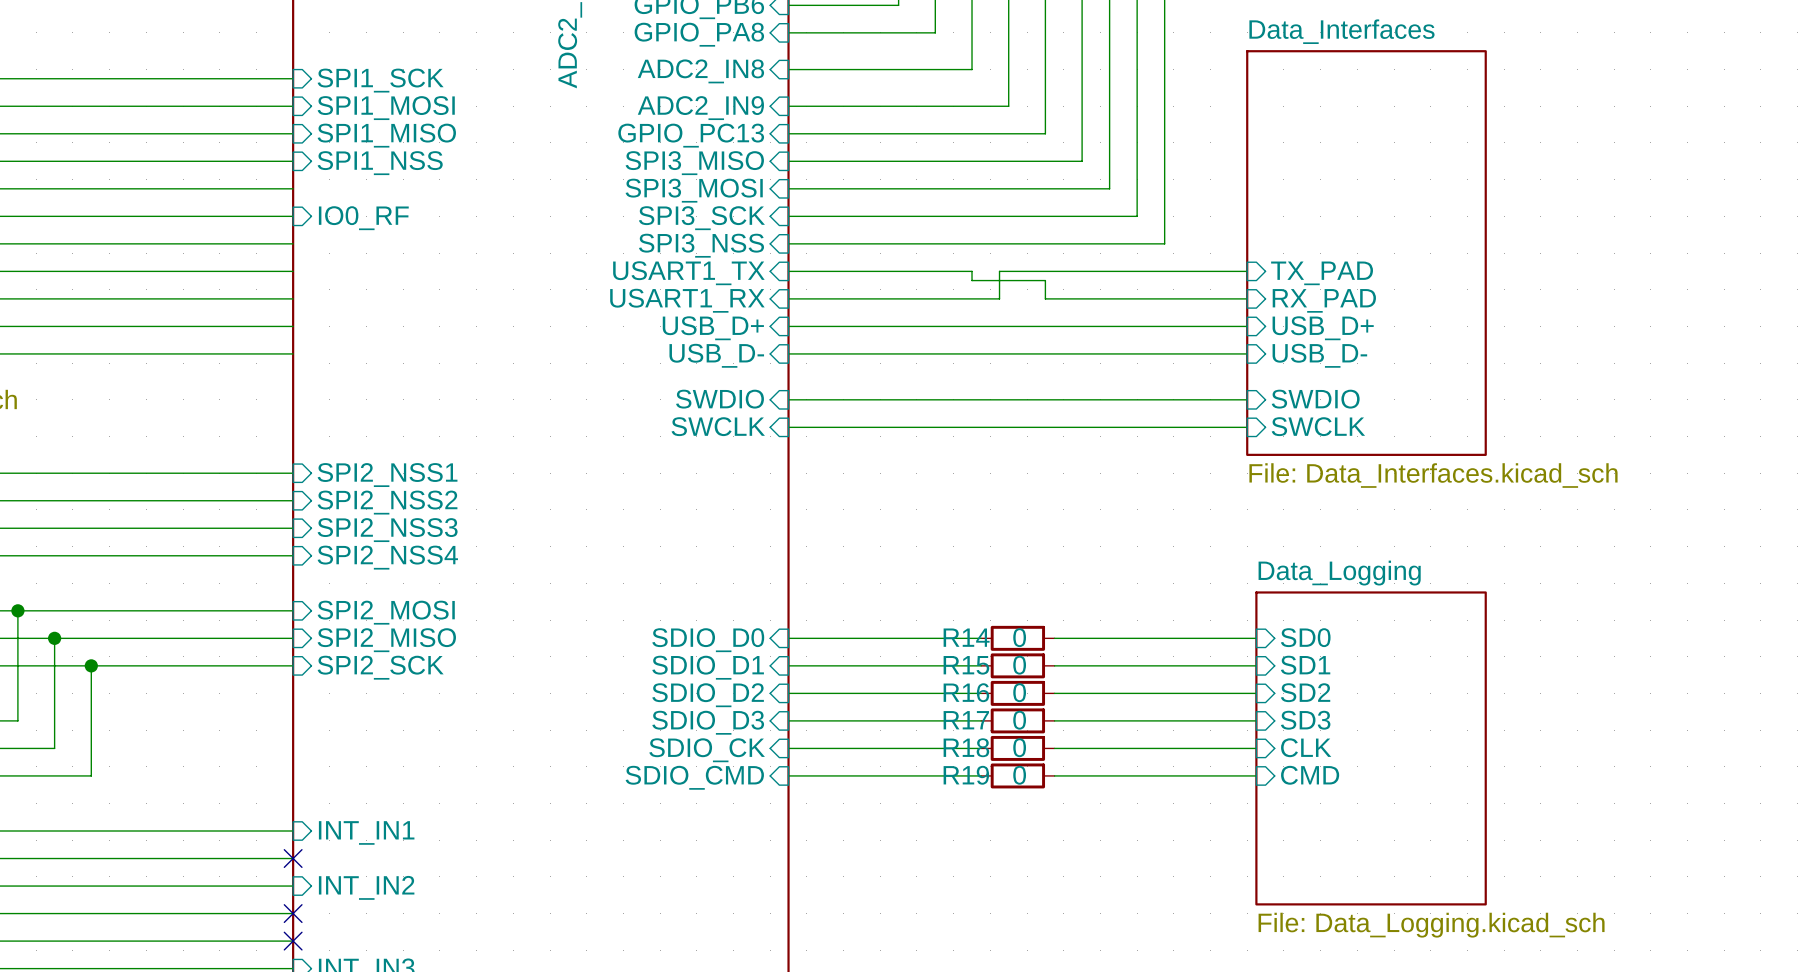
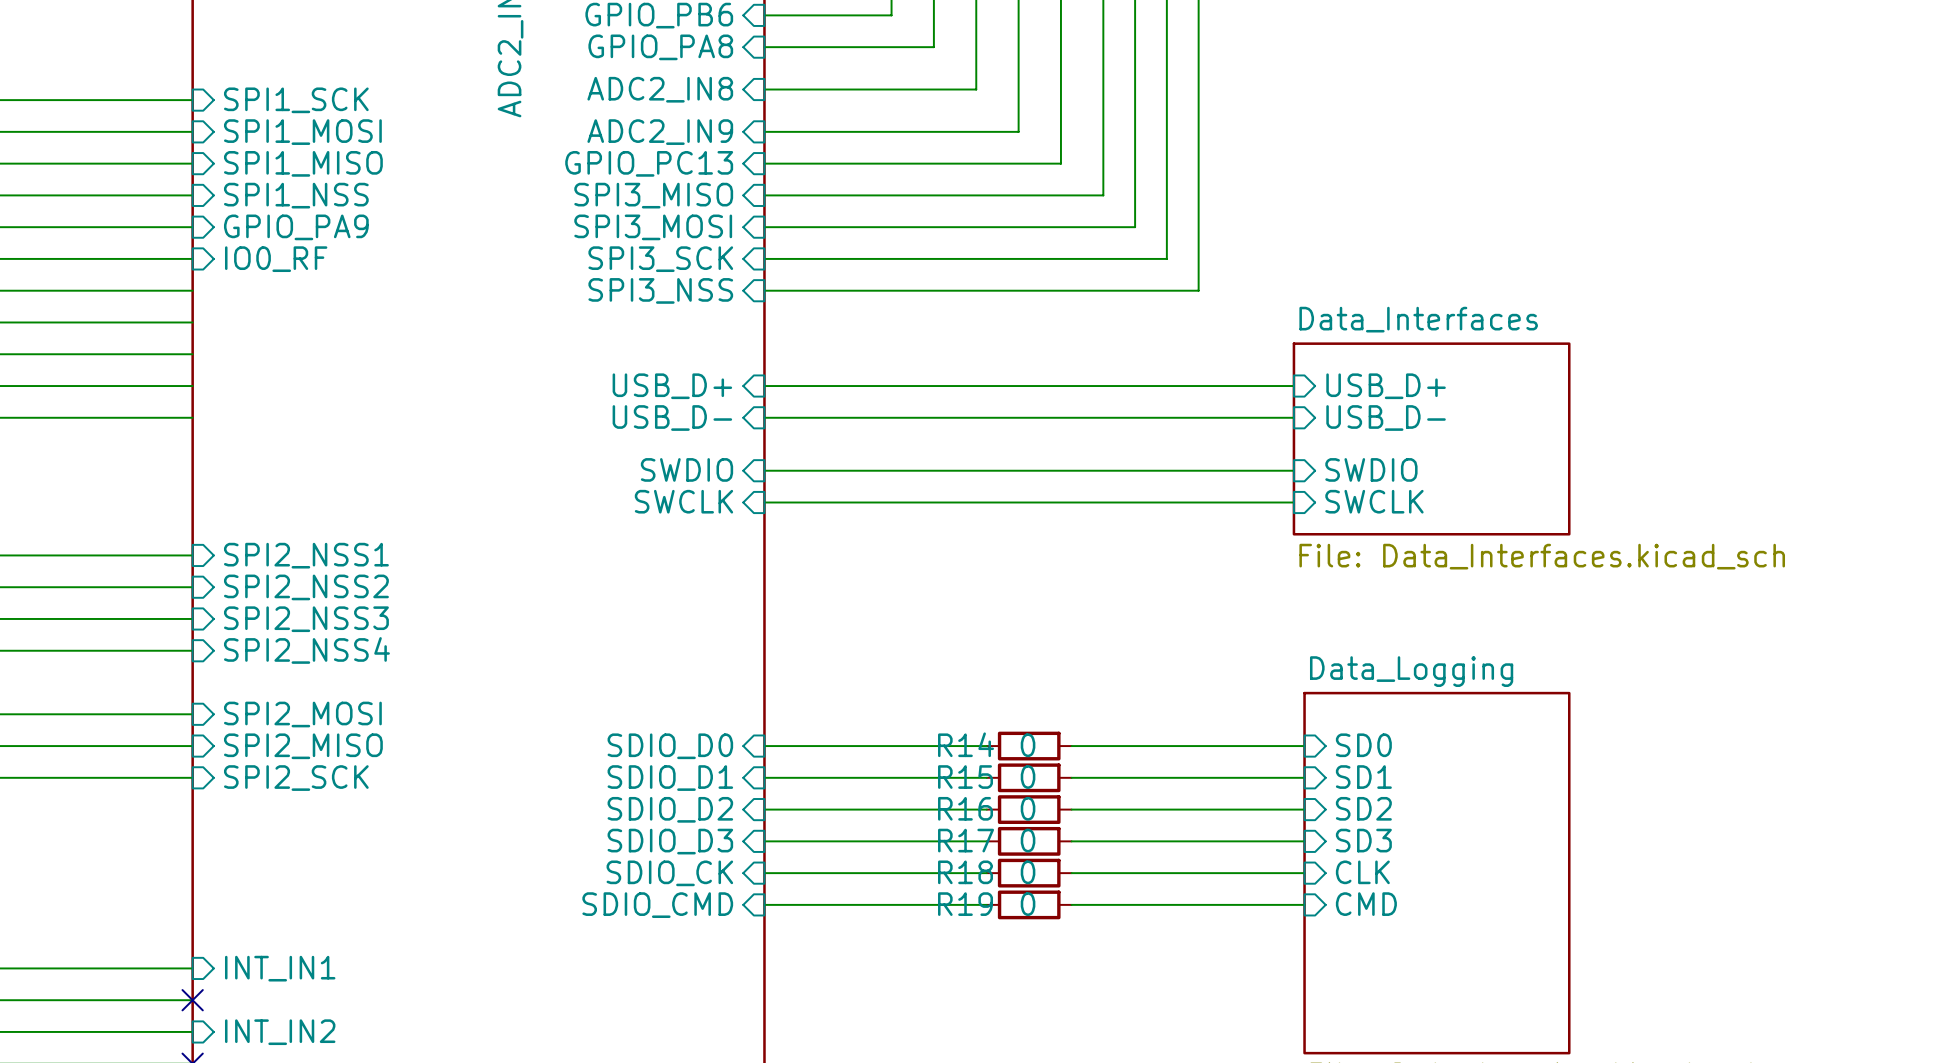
sheet pin: none -> GPIO_PA9 (296, 227)
sheet Data_Interfaces: File: Data_Interfaces.kicad_sch (1366, 253) -> none
wire: (788, 271) (972, 271) (972, 280) (1045, 280) (1045, 298) (1247, 298) -> none
wire: (1247, 271) (999, 271) (999, 298) (788, 298) -> none
sheet pin: USART1_TX (688, 273) -> none
sheet pin: TX_PAD (1322, 273) -> none
sheet pin: USART1_RX (687, 300) -> none
sheet pin: RX_PAD (1324, 300) -> none
sheet Data_Interfaces: none -> File: Data_Interfaces.kicad_sch (1431, 438)

